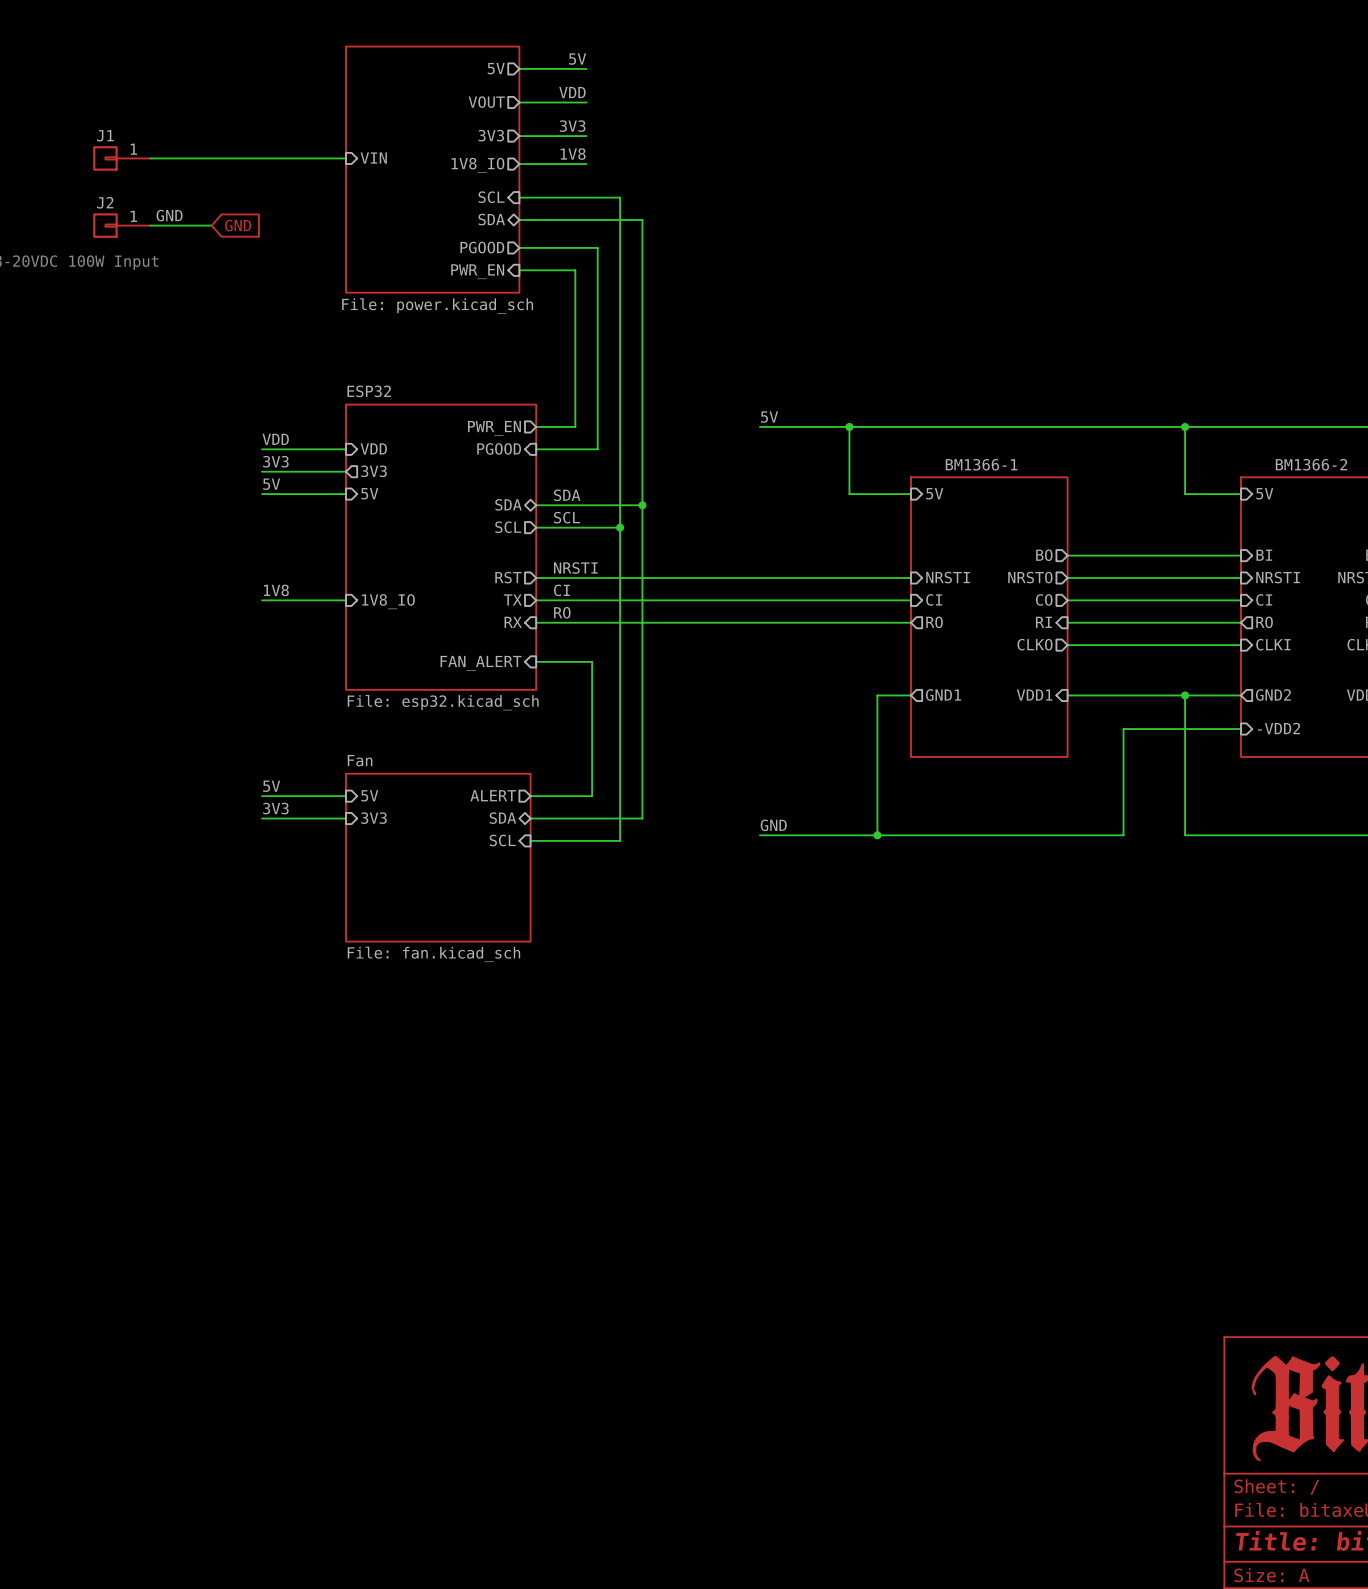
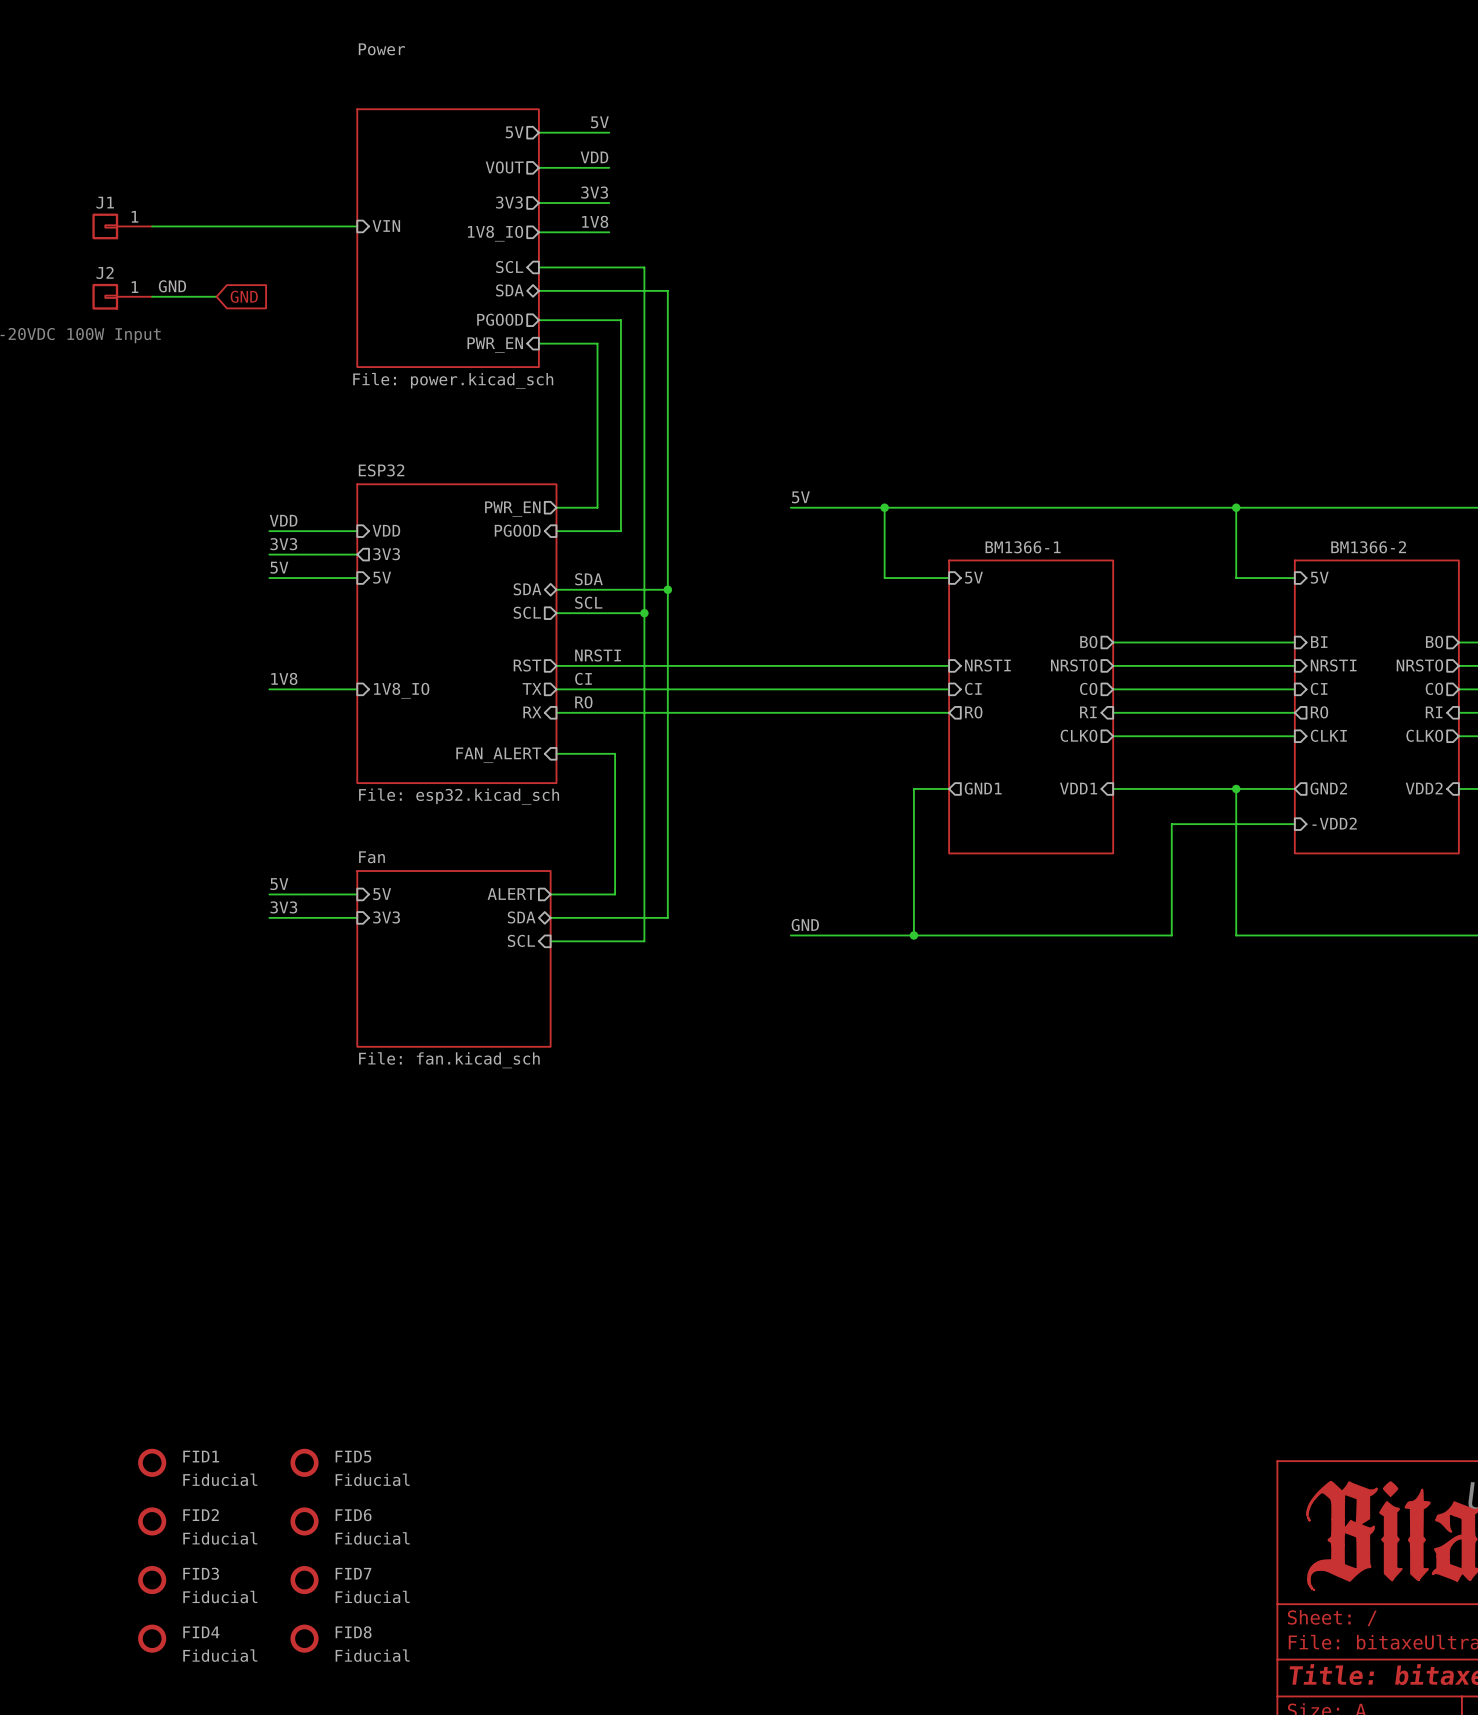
FID1: none -> Fiducial (152, 1462)
FID5: none -> Fiducial (304, 1462)
FID2: none -> Fiducial (152, 1521)
FID6: none -> Fiducial (304, 1521)
FID3: none -> Fiducial (152, 1580)
FID7: none -> Fiducial (304, 1580)
FID4: none -> Fiducial (152, 1638)
FID8: none -> Fiducial (304, 1638)

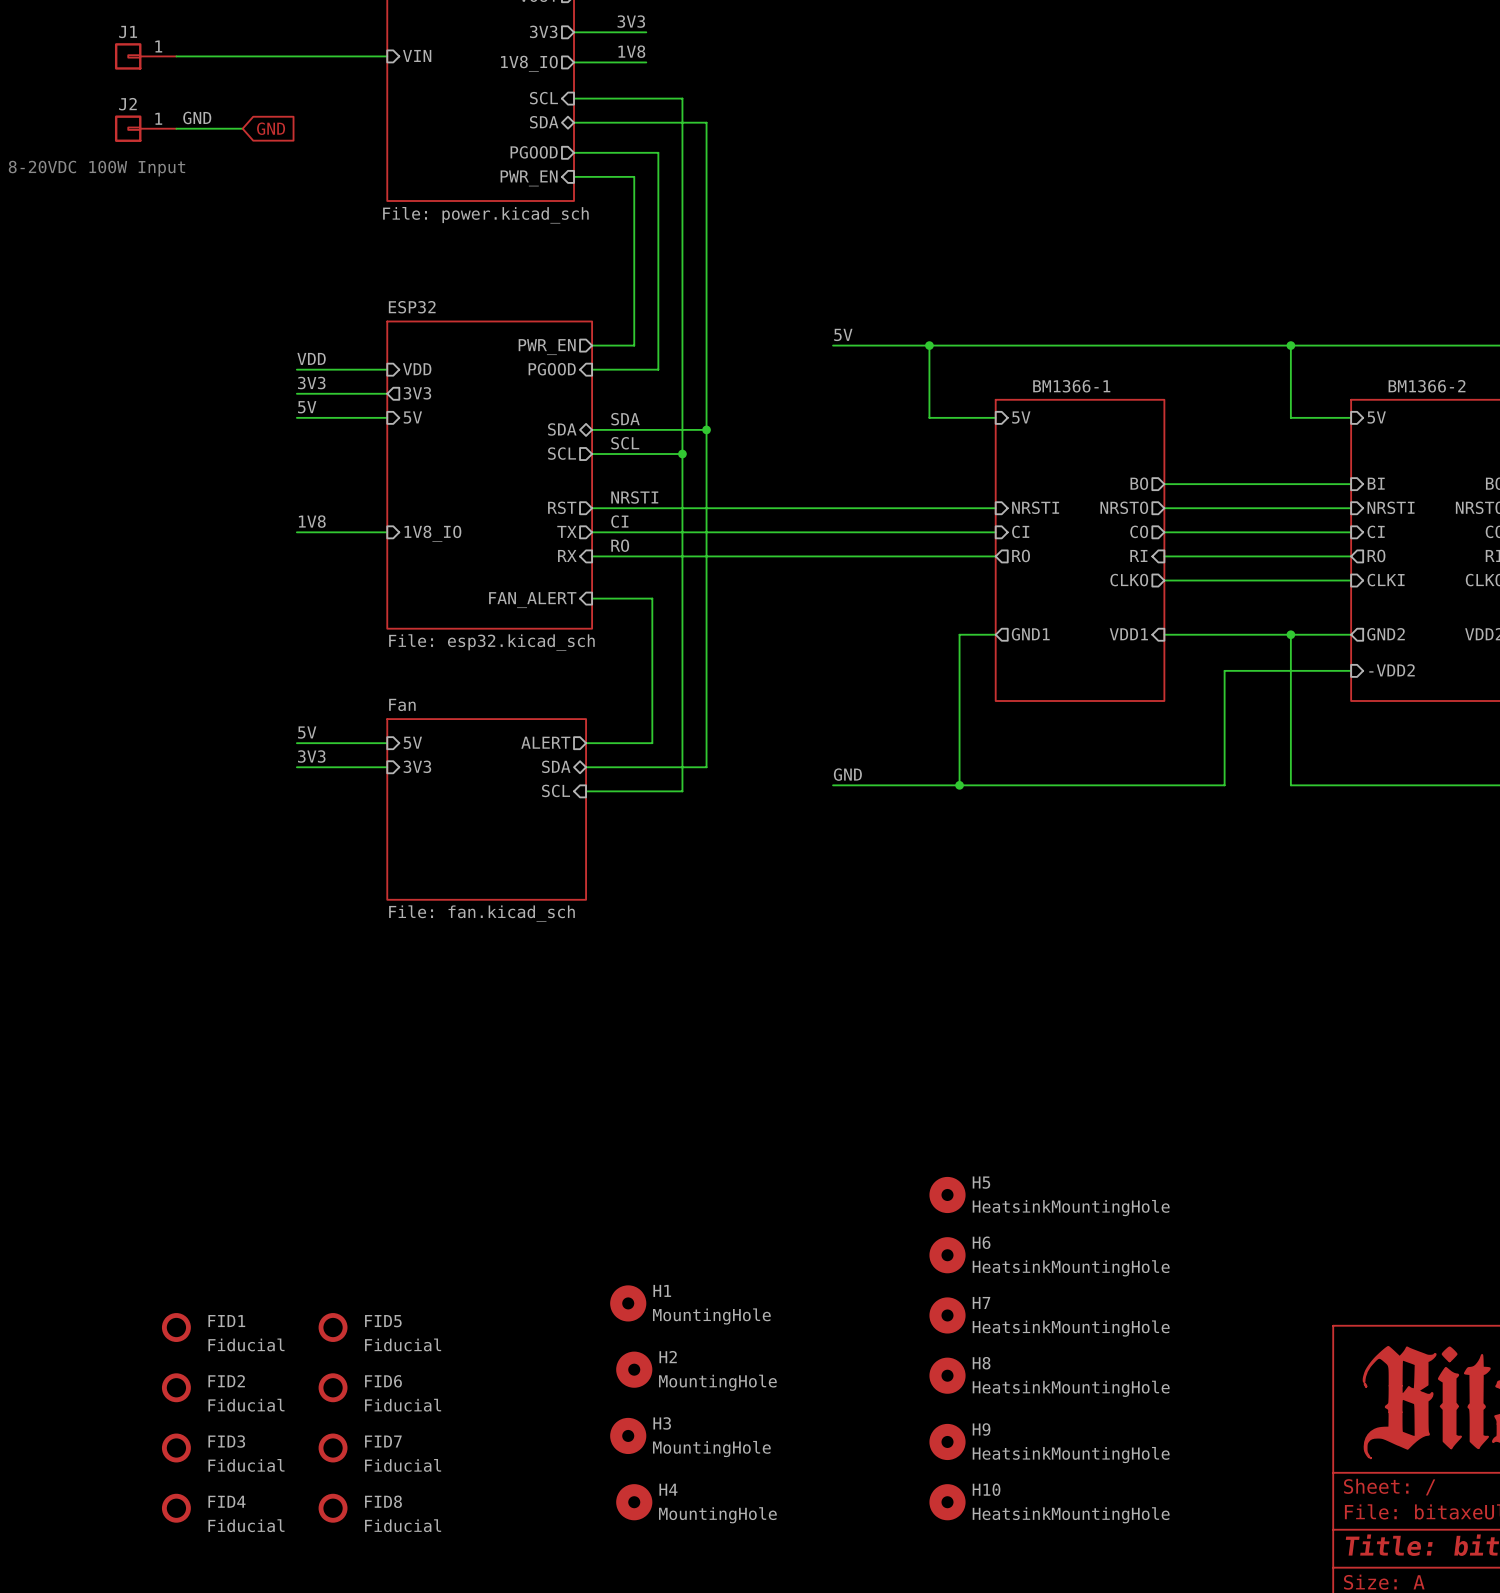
H5: none -> HeatsinkMountingHole (947, 1194)
H6: none -> HeatsinkMountingHole (947, 1255)
H1: none -> MountingHole (628, 1303)
H7: none -> HeatsinkMountingHole (947, 1315)
H2: none -> MountingHole (634, 1369)
H8: none -> HeatsinkMountingHole (947, 1375)
H3: none -> MountingHole (628, 1435)
H9: none -> HeatsinkMountingHole (947, 1441)
H4: none -> MountingHole (634, 1502)
H10: none -> HeatsinkMountingHole (947, 1502)

